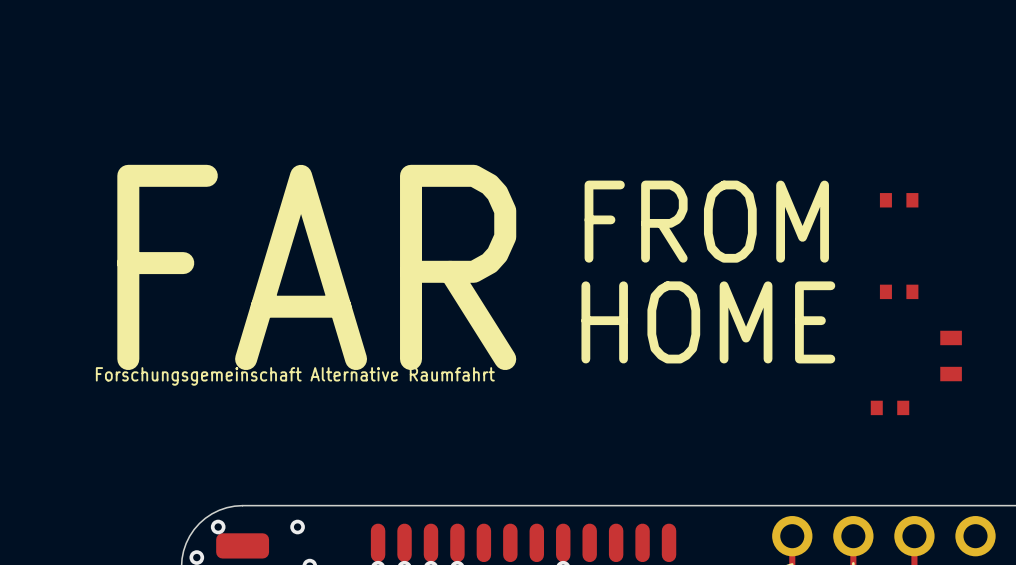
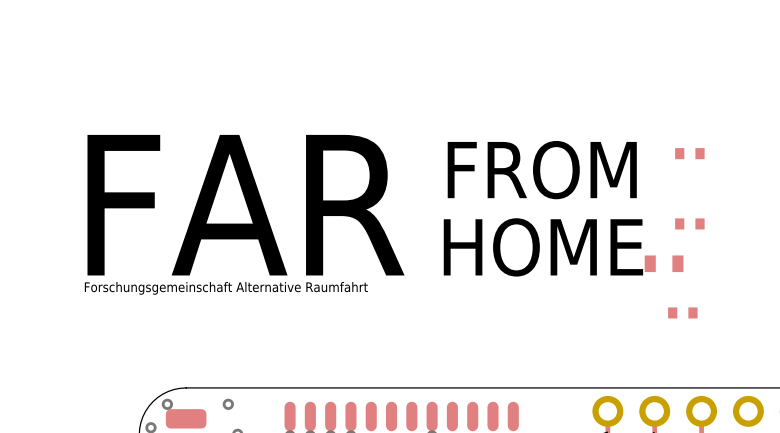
part rotation: 0° (951, 356) -> 90° clockwise (664, 263)
part position: (951, 356) -> (664, 263)

